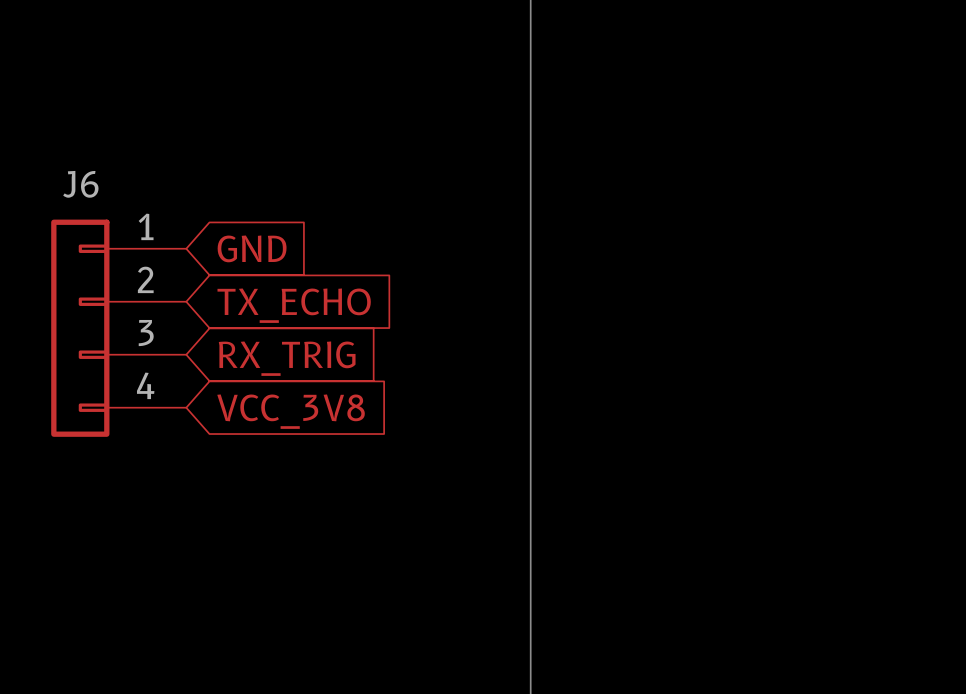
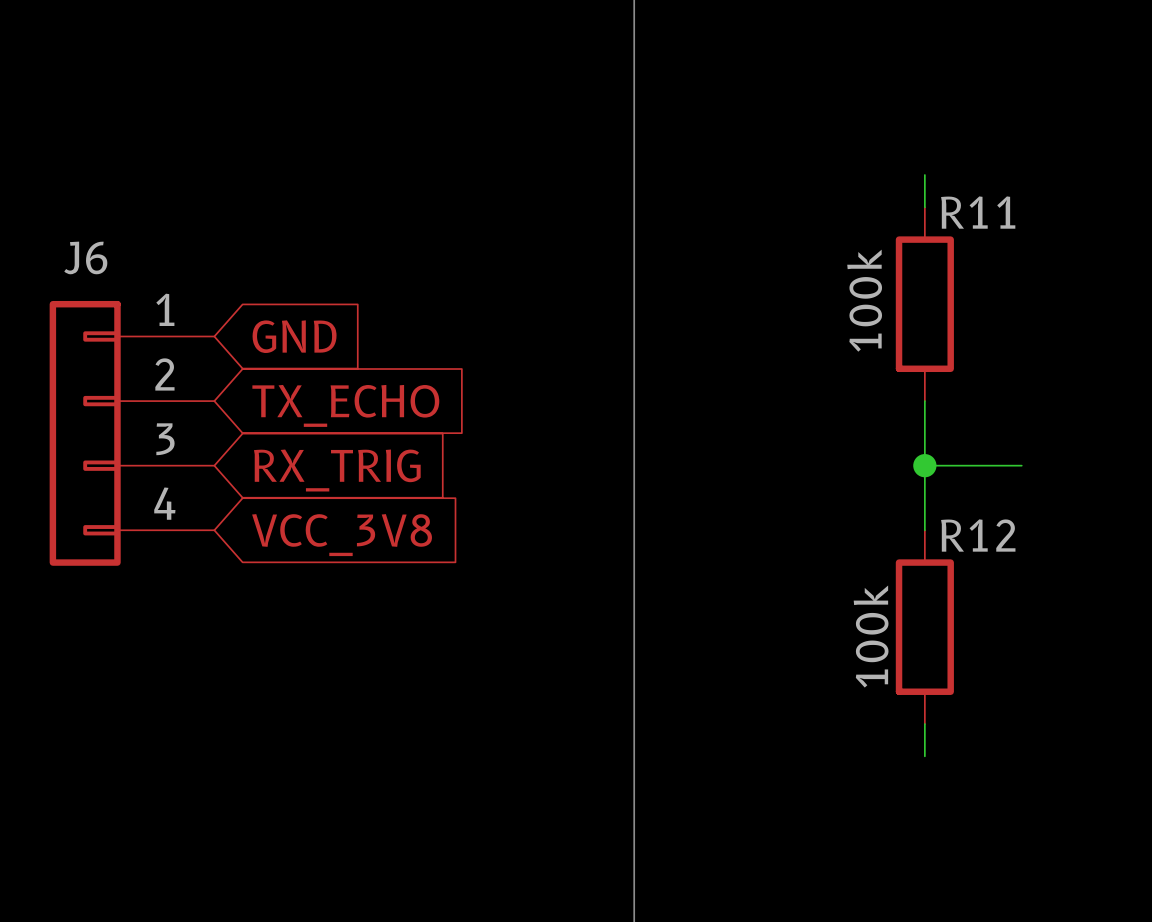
wire: none -> (924, 175) (924, 207)
R11: none -> 100k (924, 304)
wire: none -> (924, 401) (924, 530)
wire: none -> (924, 465) (1021, 465)
junction: none -> (924, 465)
R12: none -> 100k (924, 627)
wire: none -> (924, 724) (924, 756)

